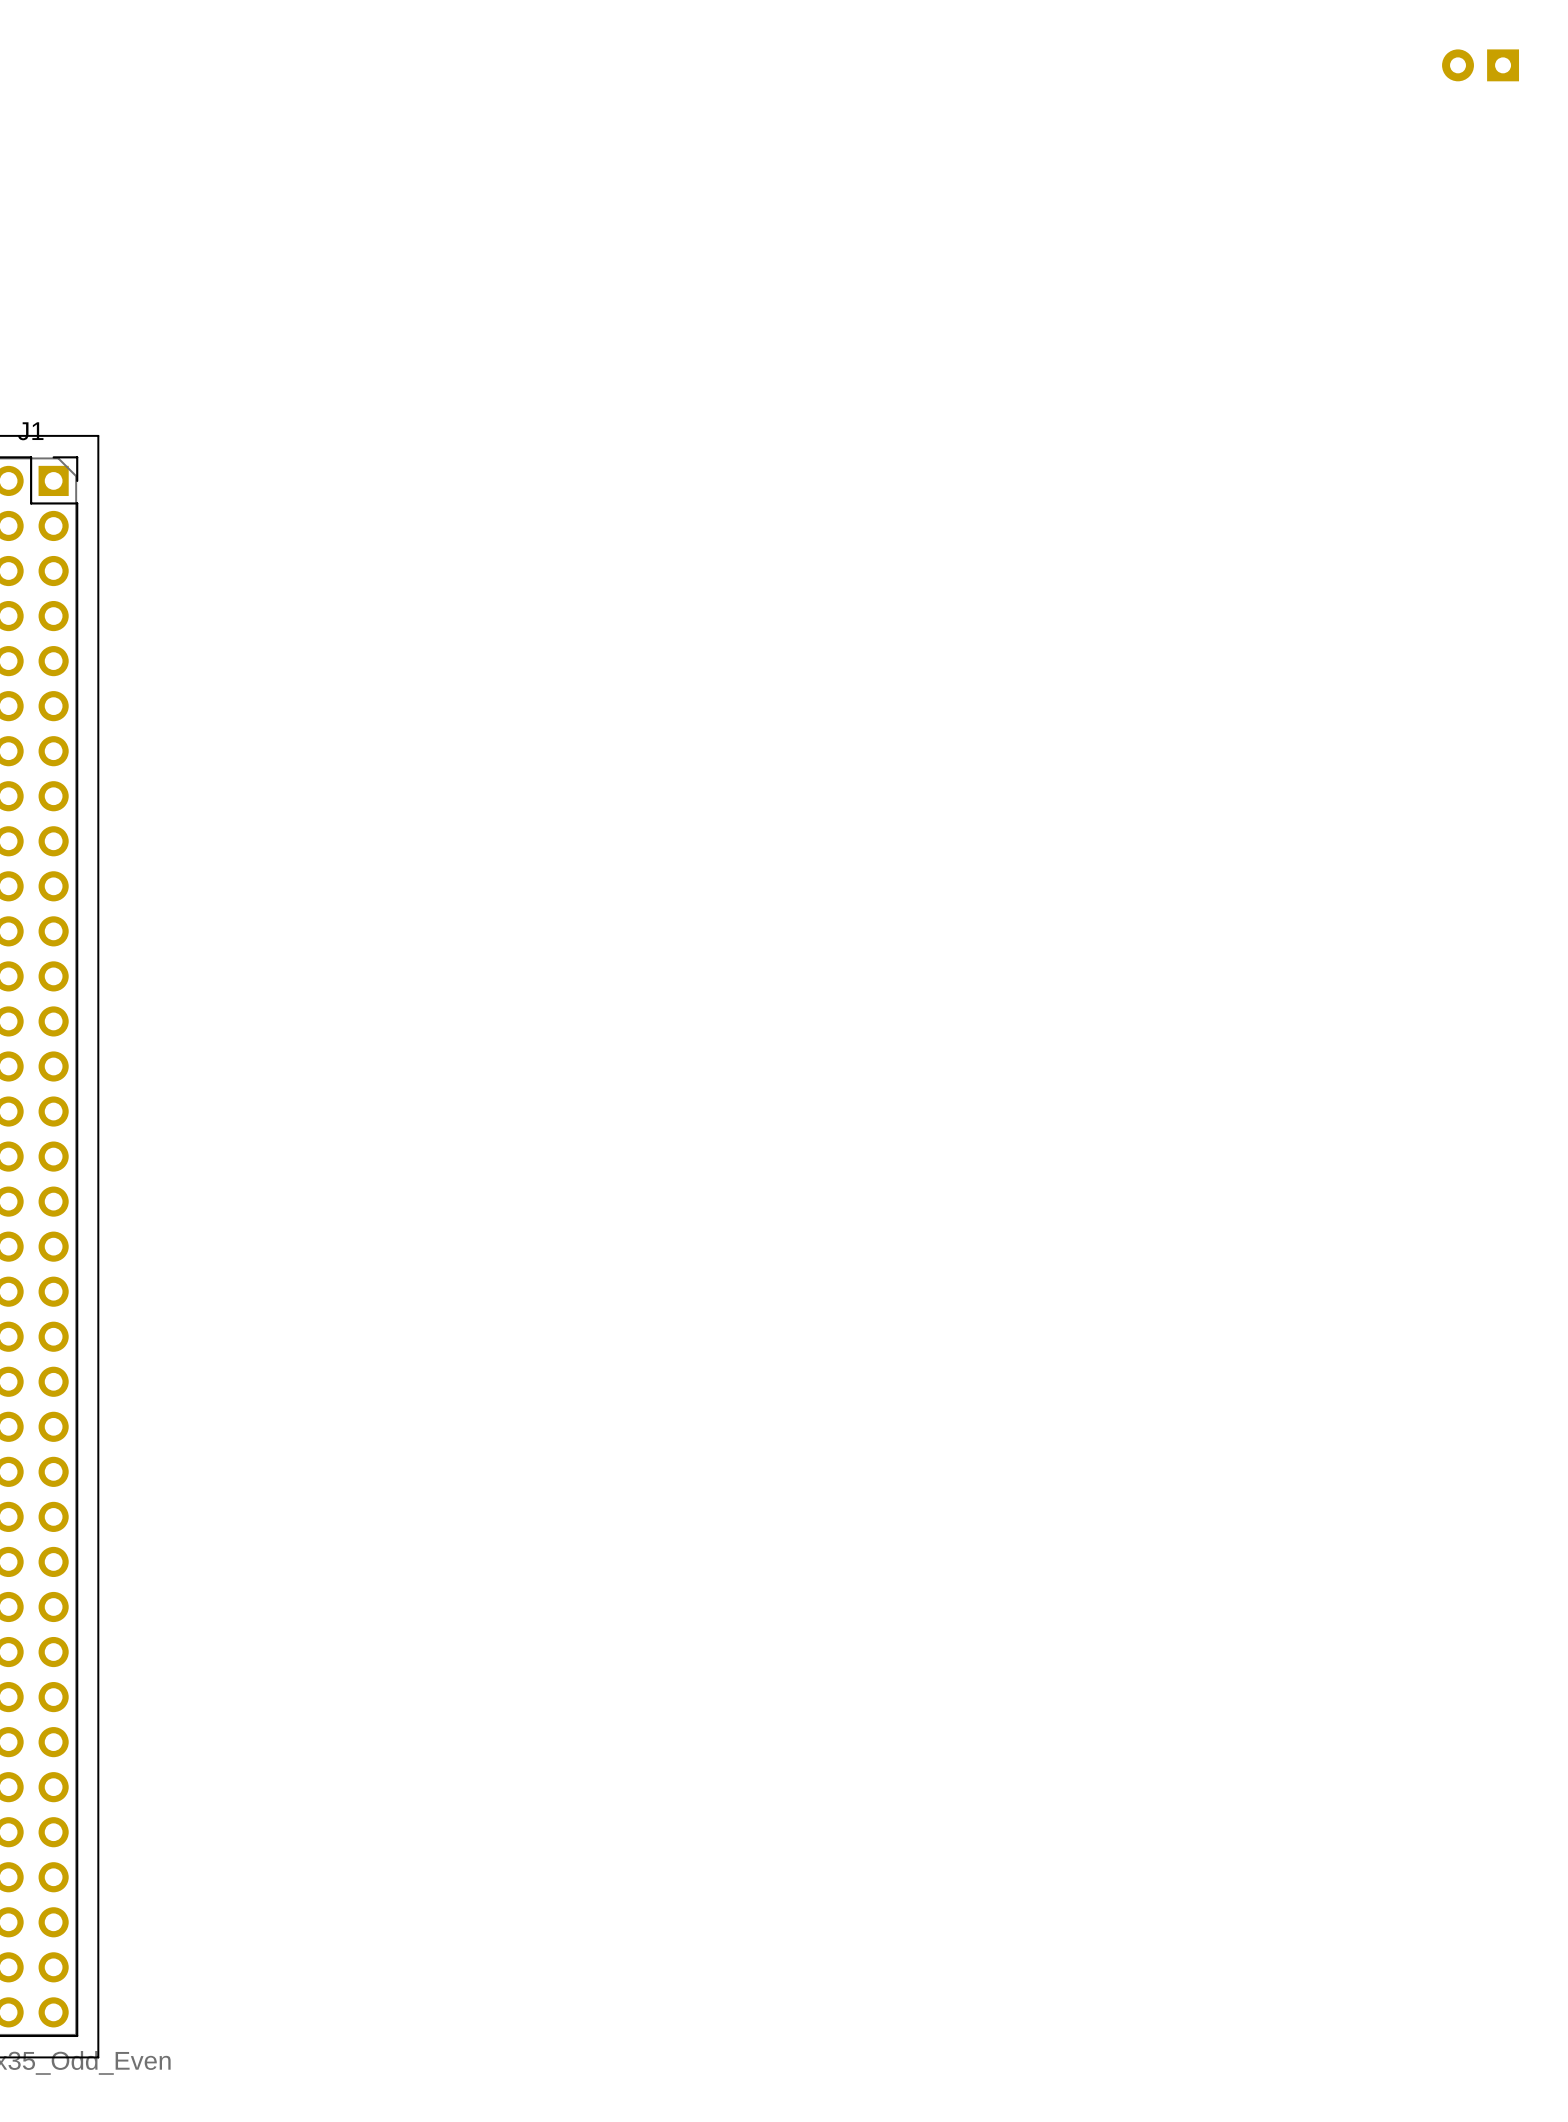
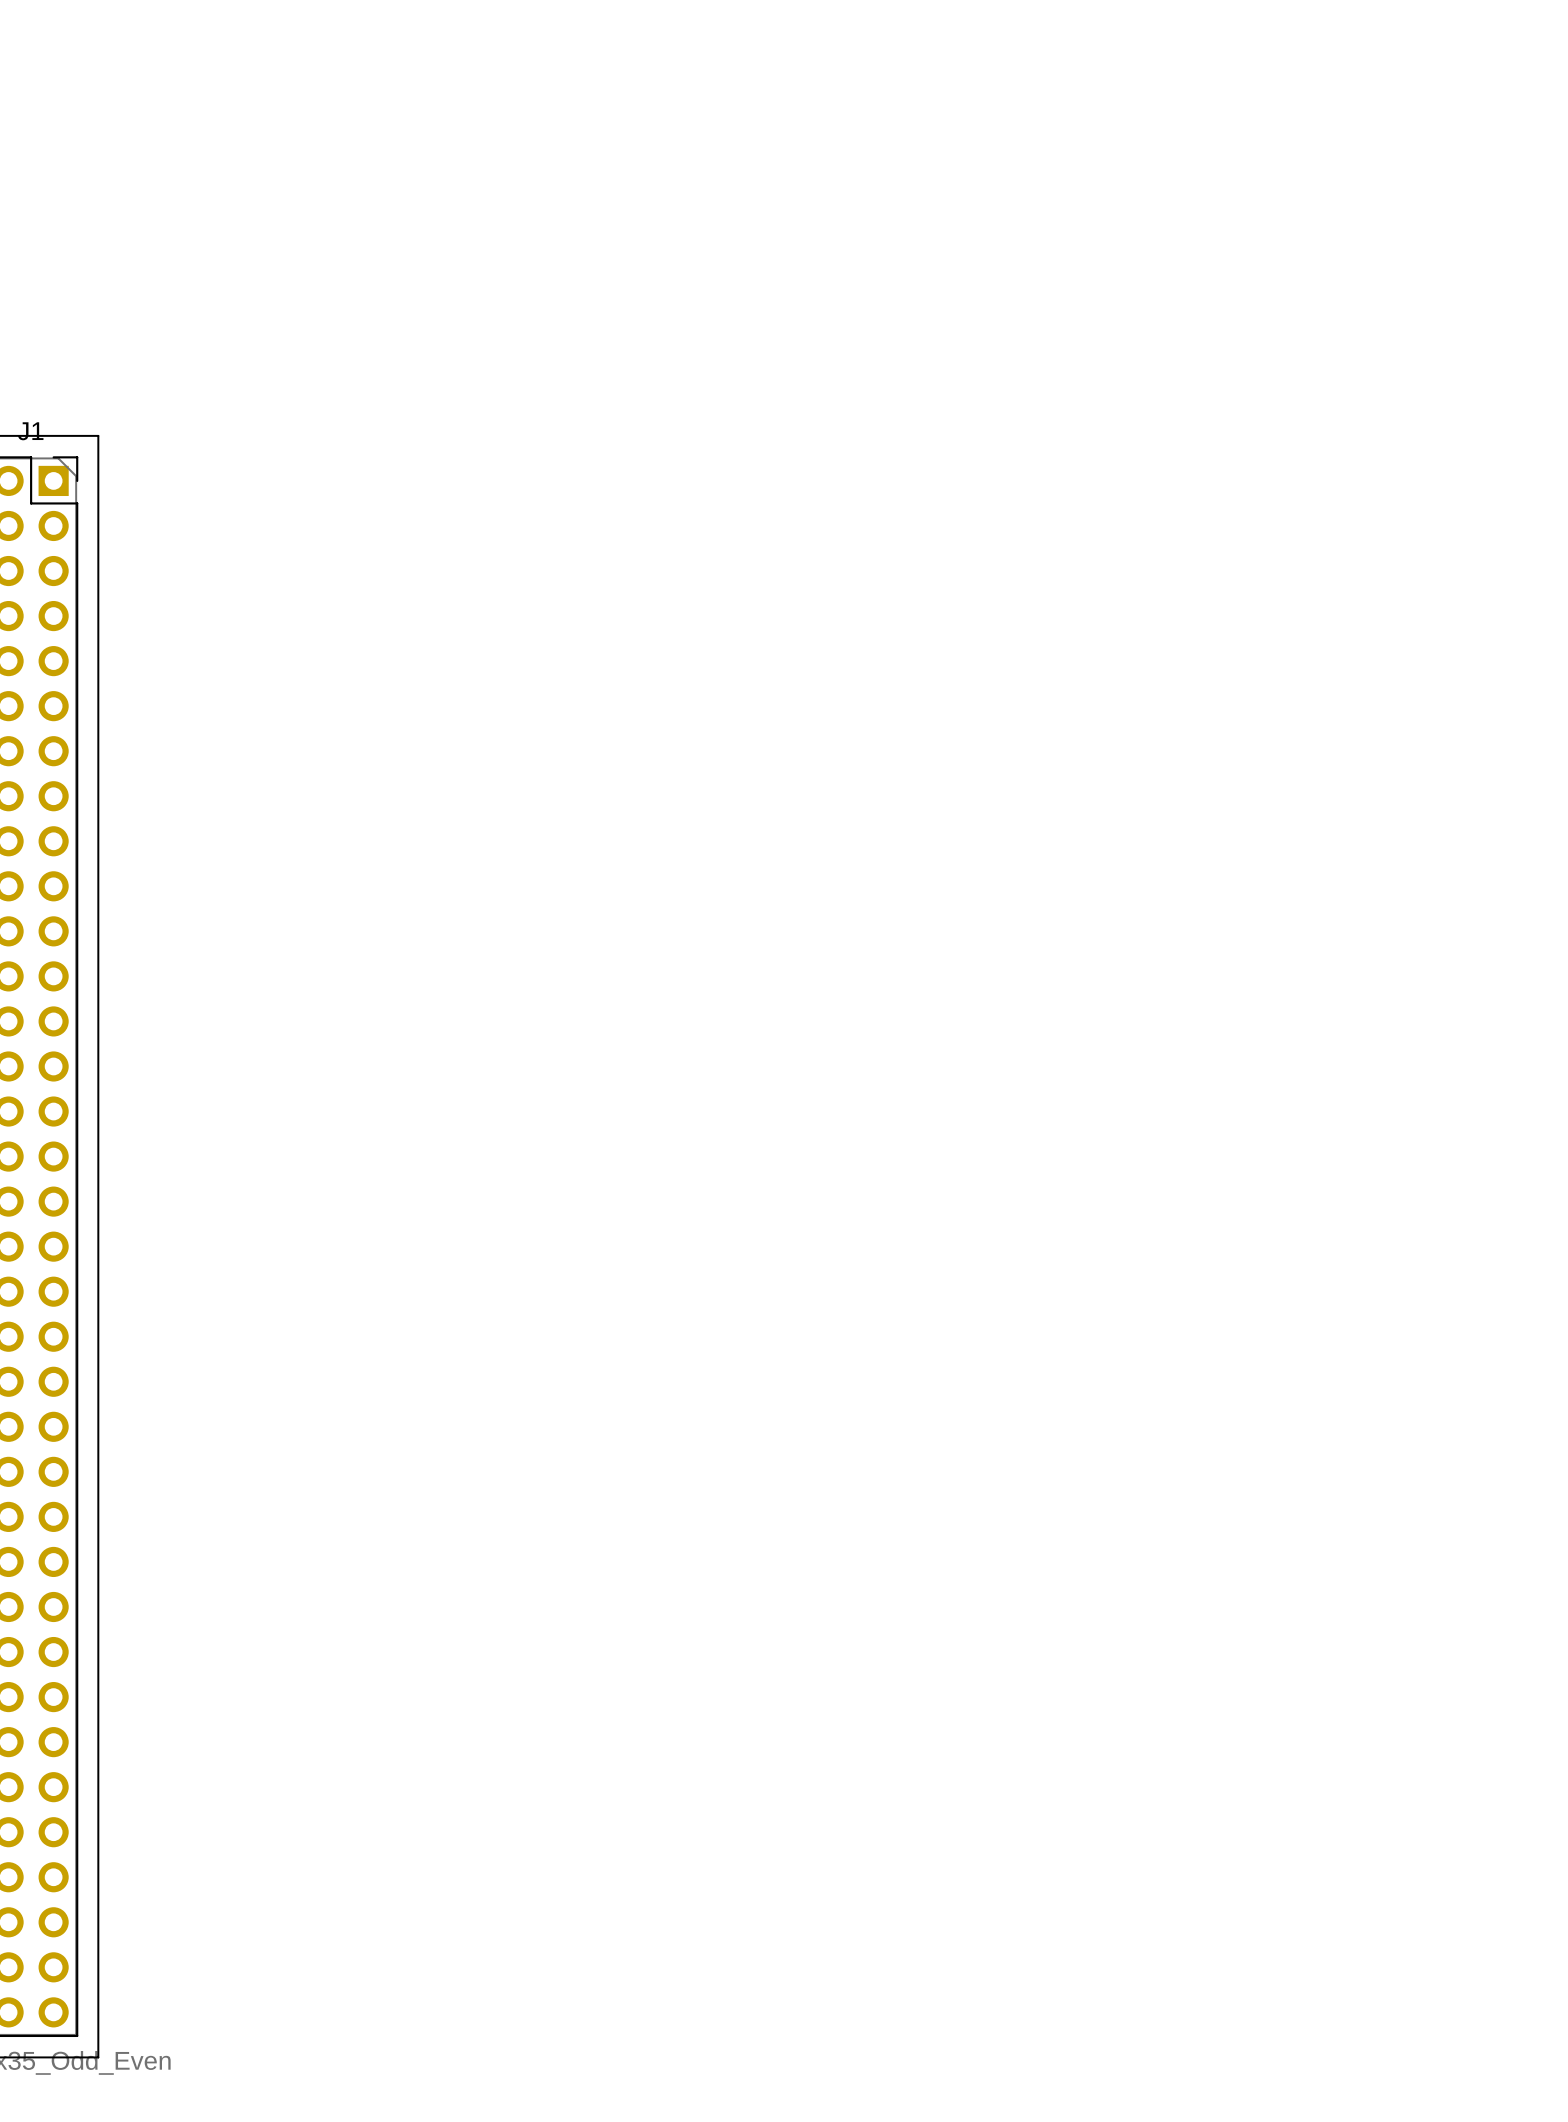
part: (1480, 65) -> none

